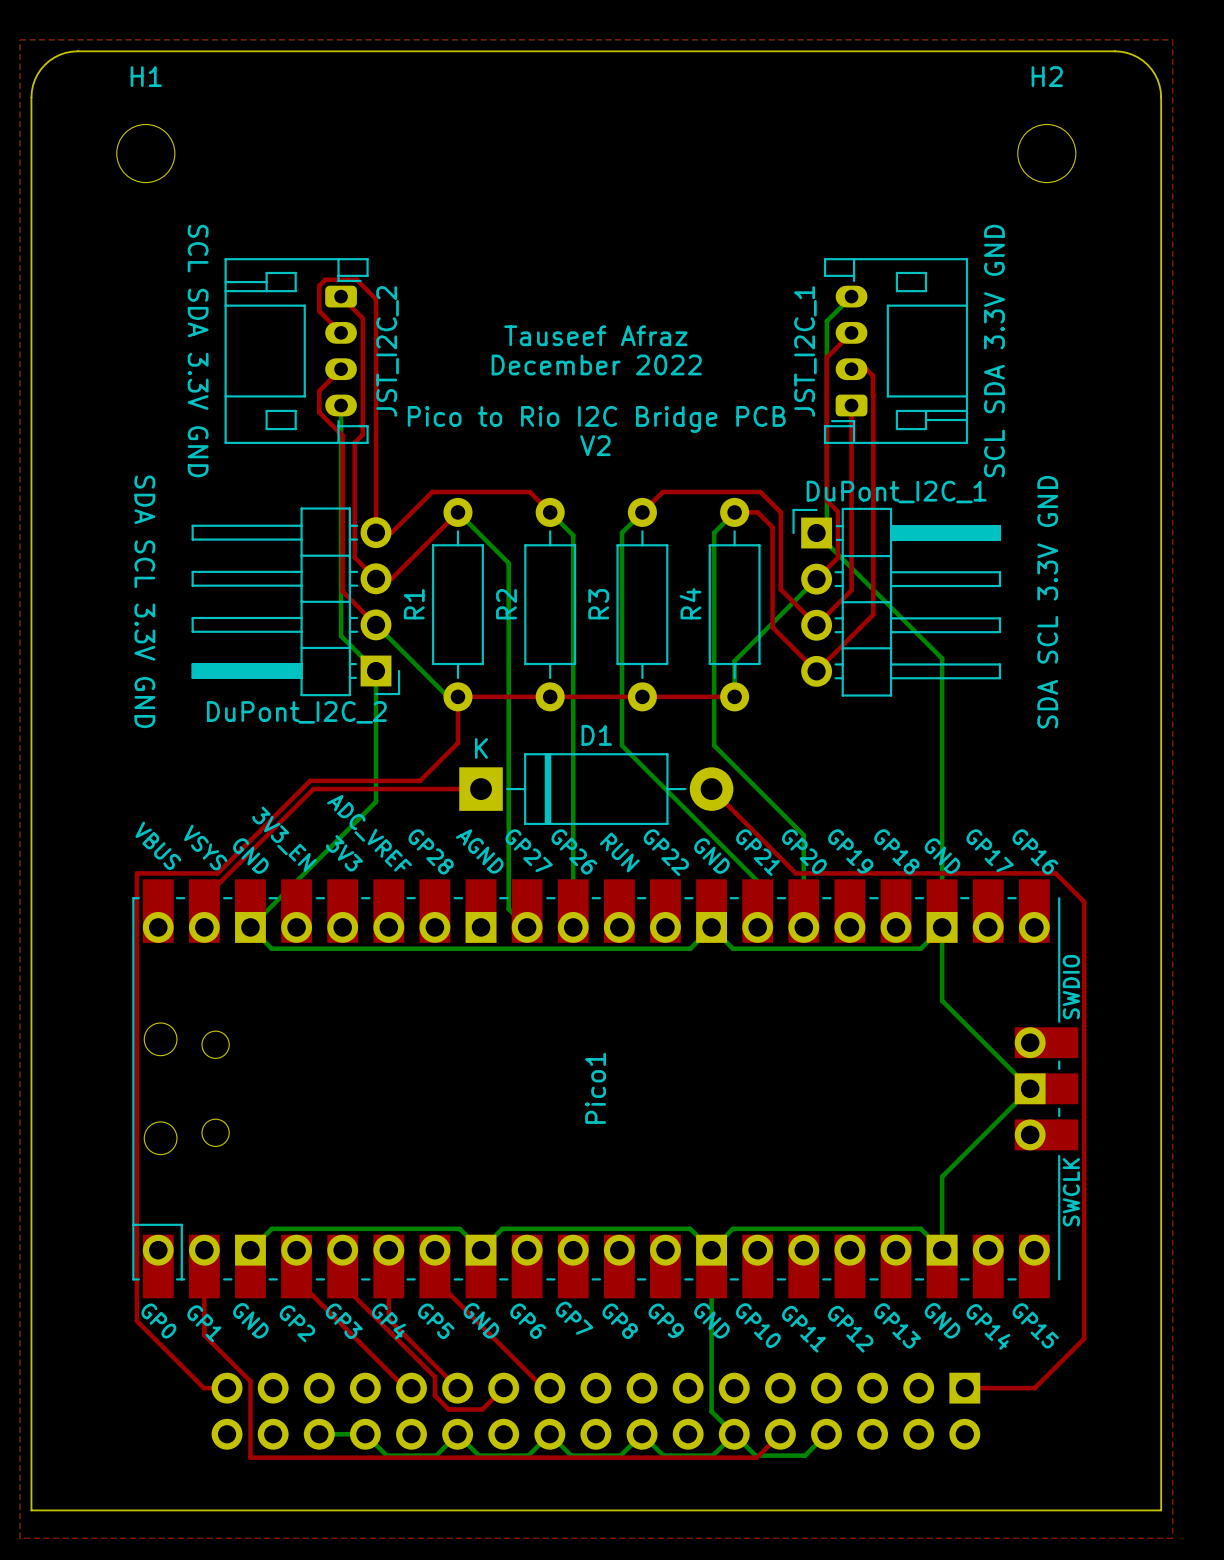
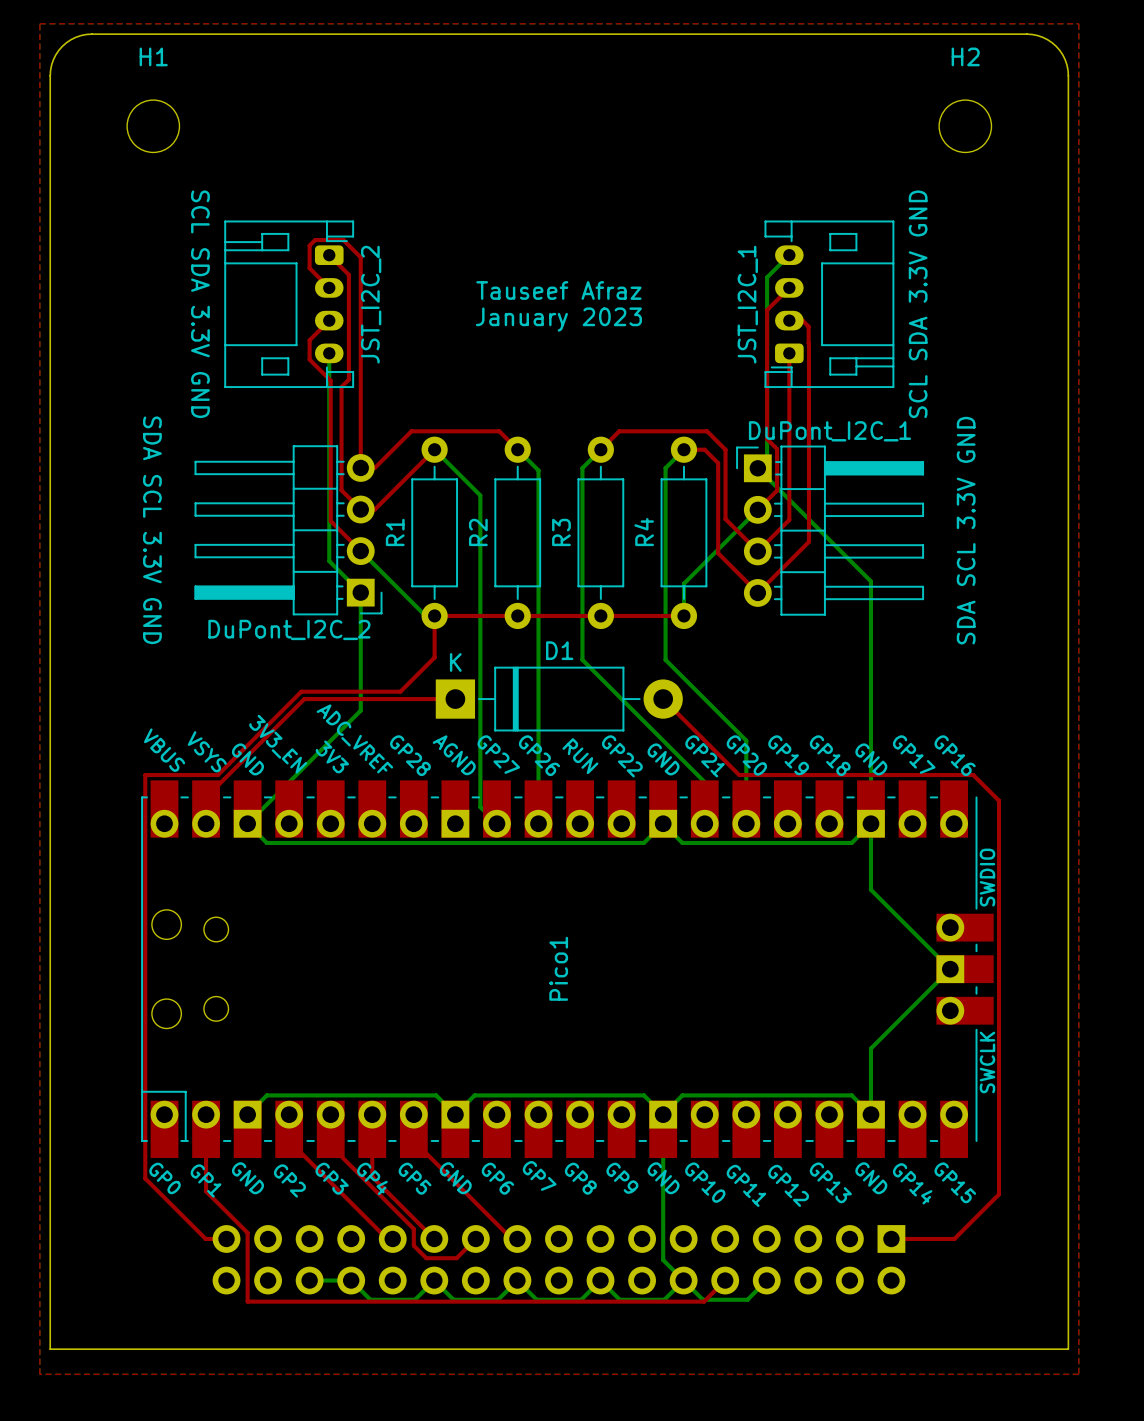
text: December 2022 (596, 364) -> January 2023 (558, 319)
text: Pico to Rio I2C Bridge PCB (596, 419) -> none
text: V2 (595, 445) -> none

